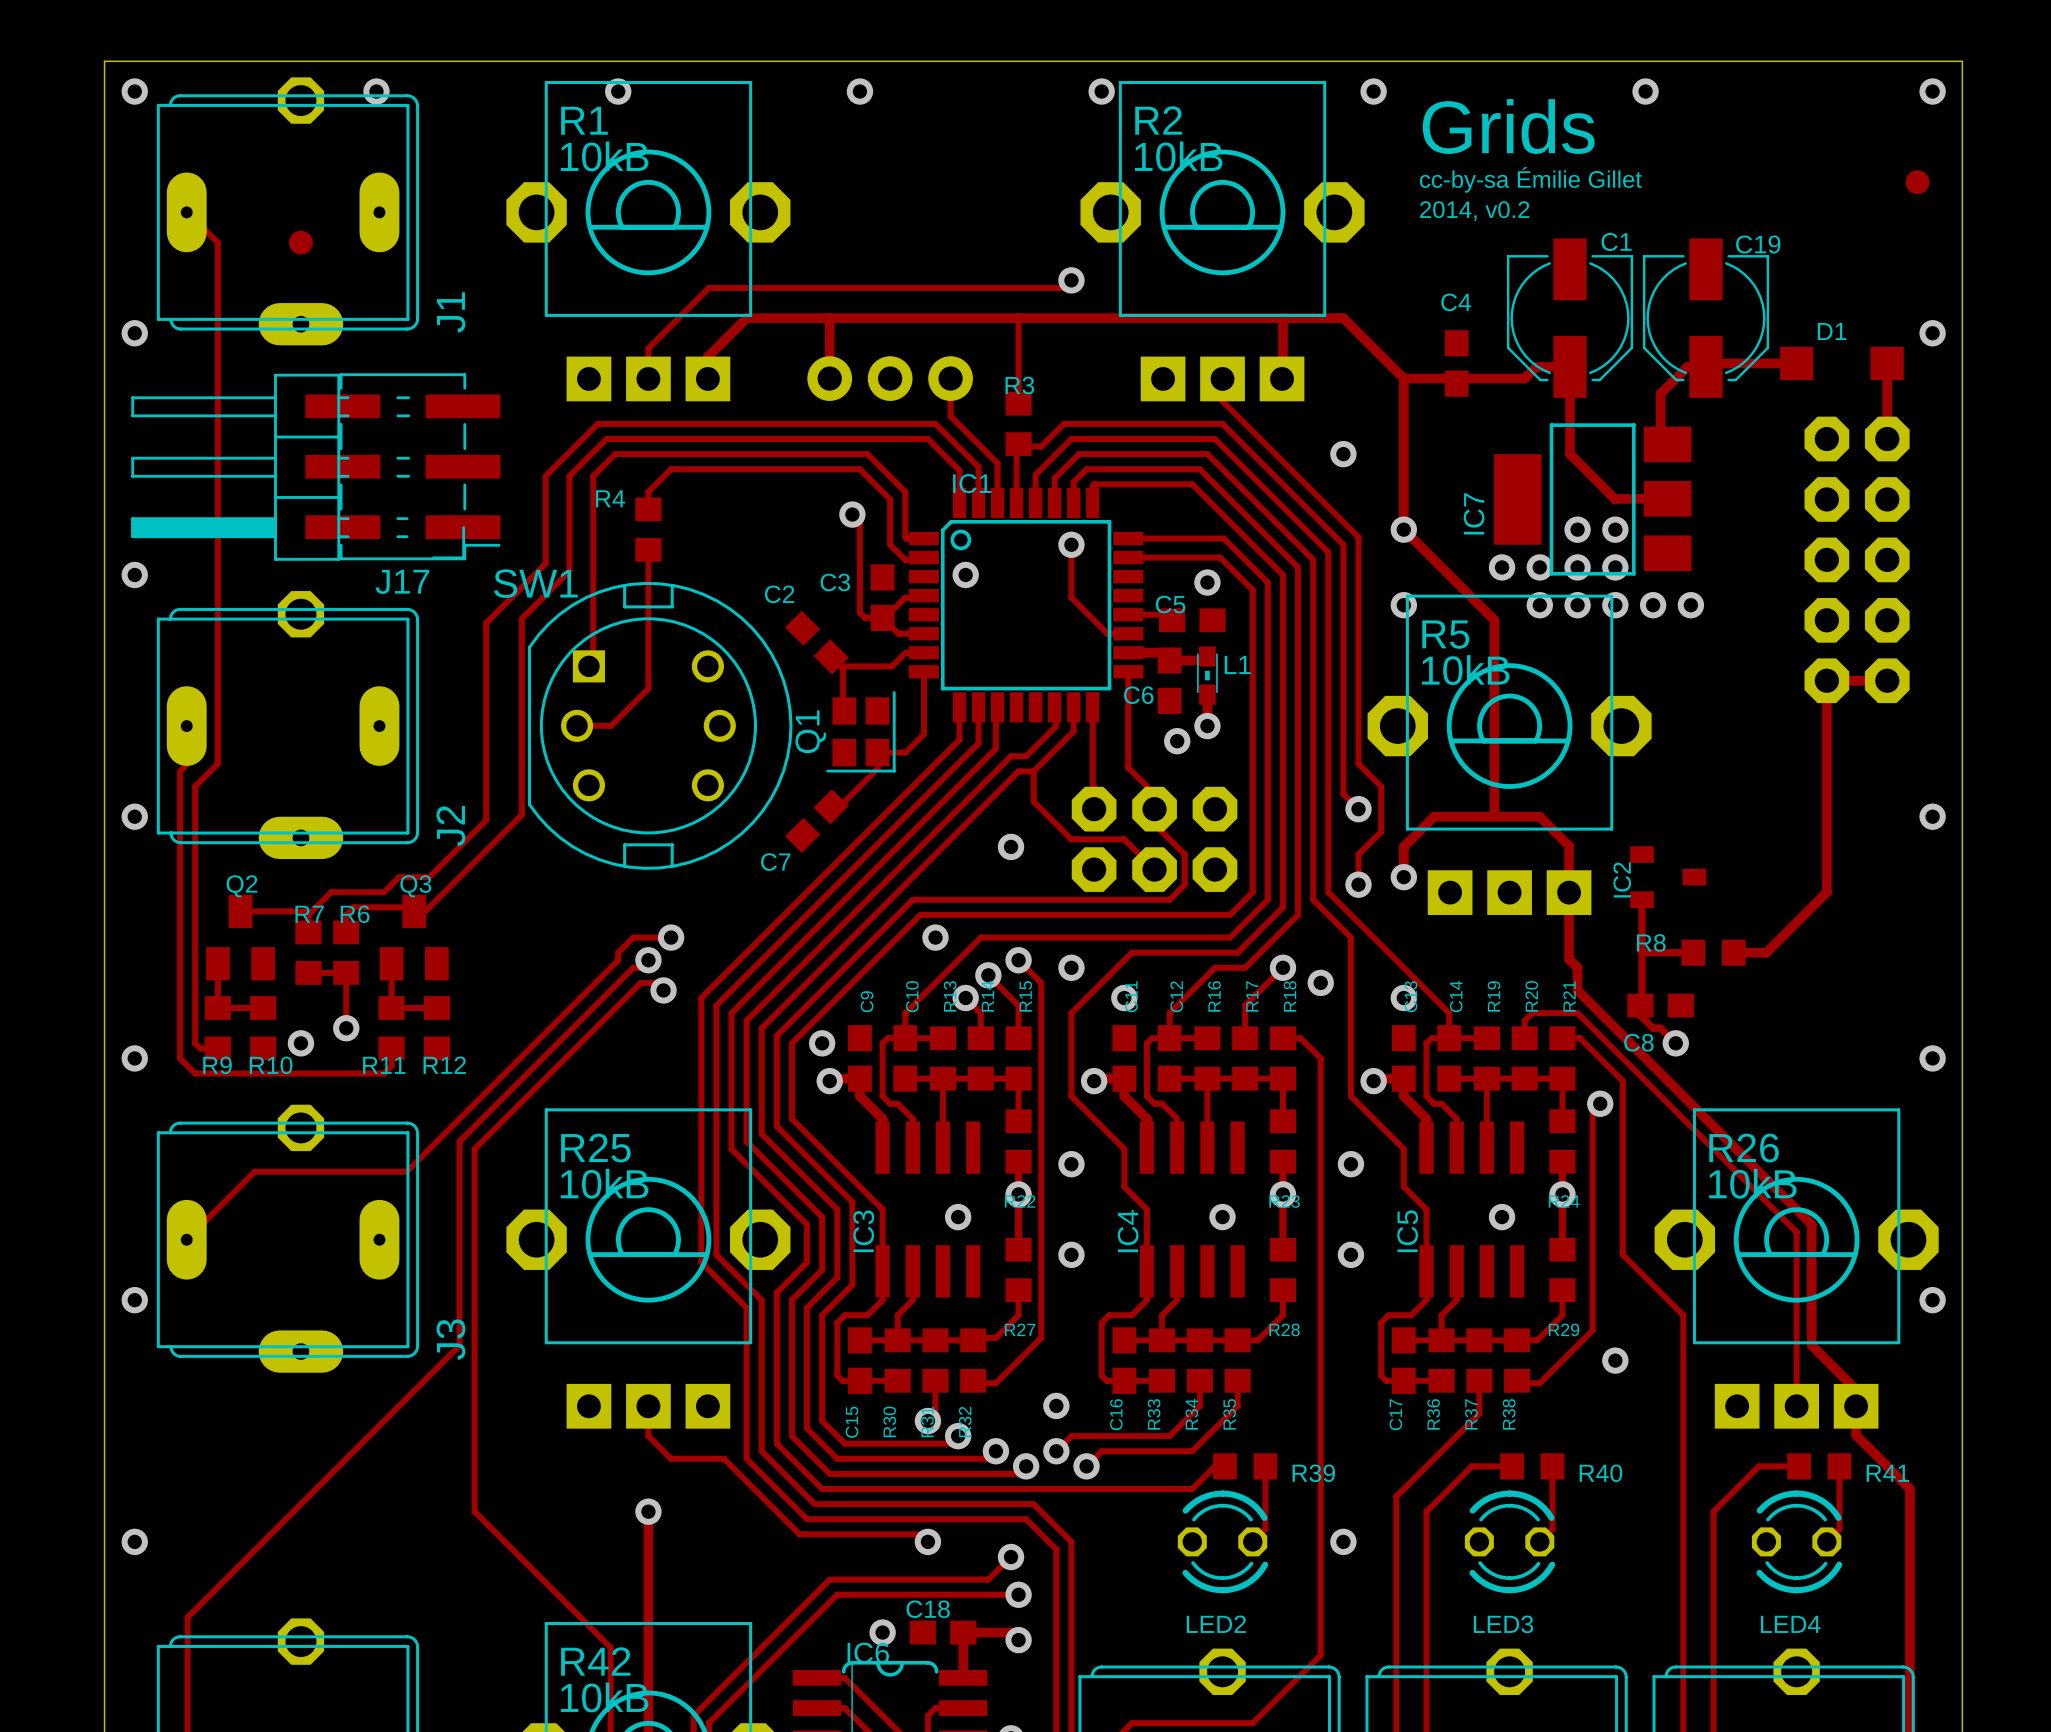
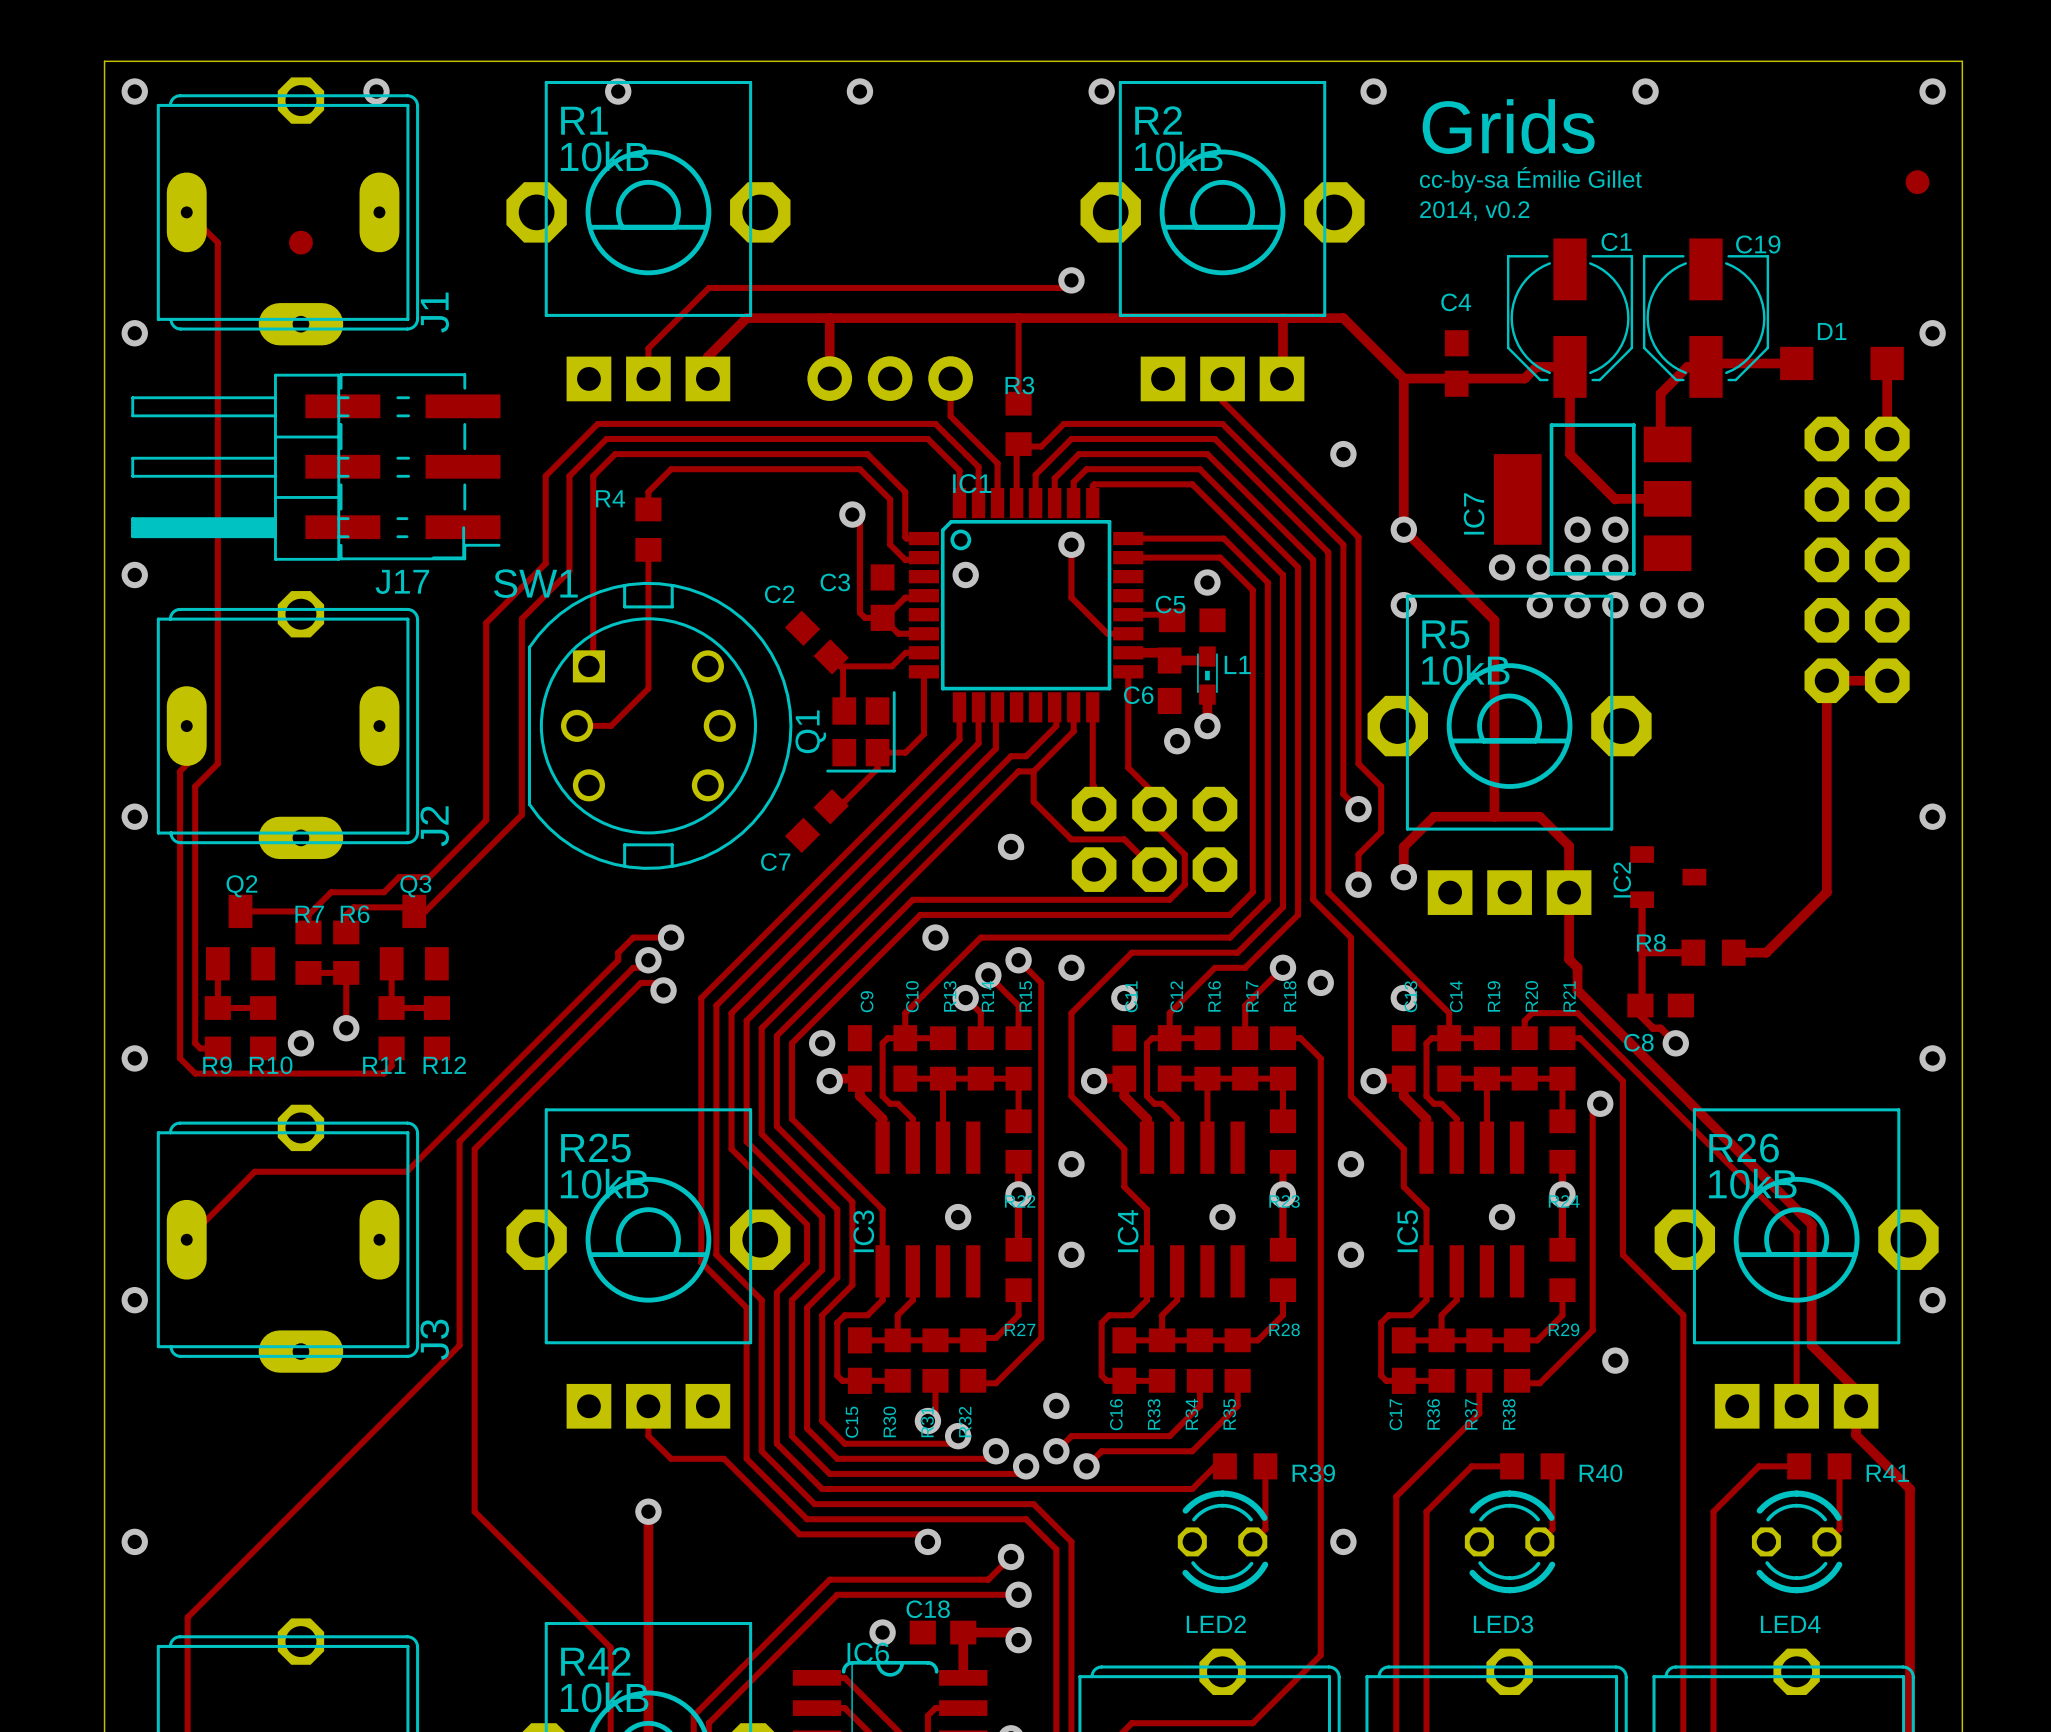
J1 name position: J1 (451, 312) -> J1 (434, 312)
J2 name position: J2 (450, 826) -> J2 (434, 826)
J3 name position: J3 (450, 1339) -> J3 (434, 1339)

